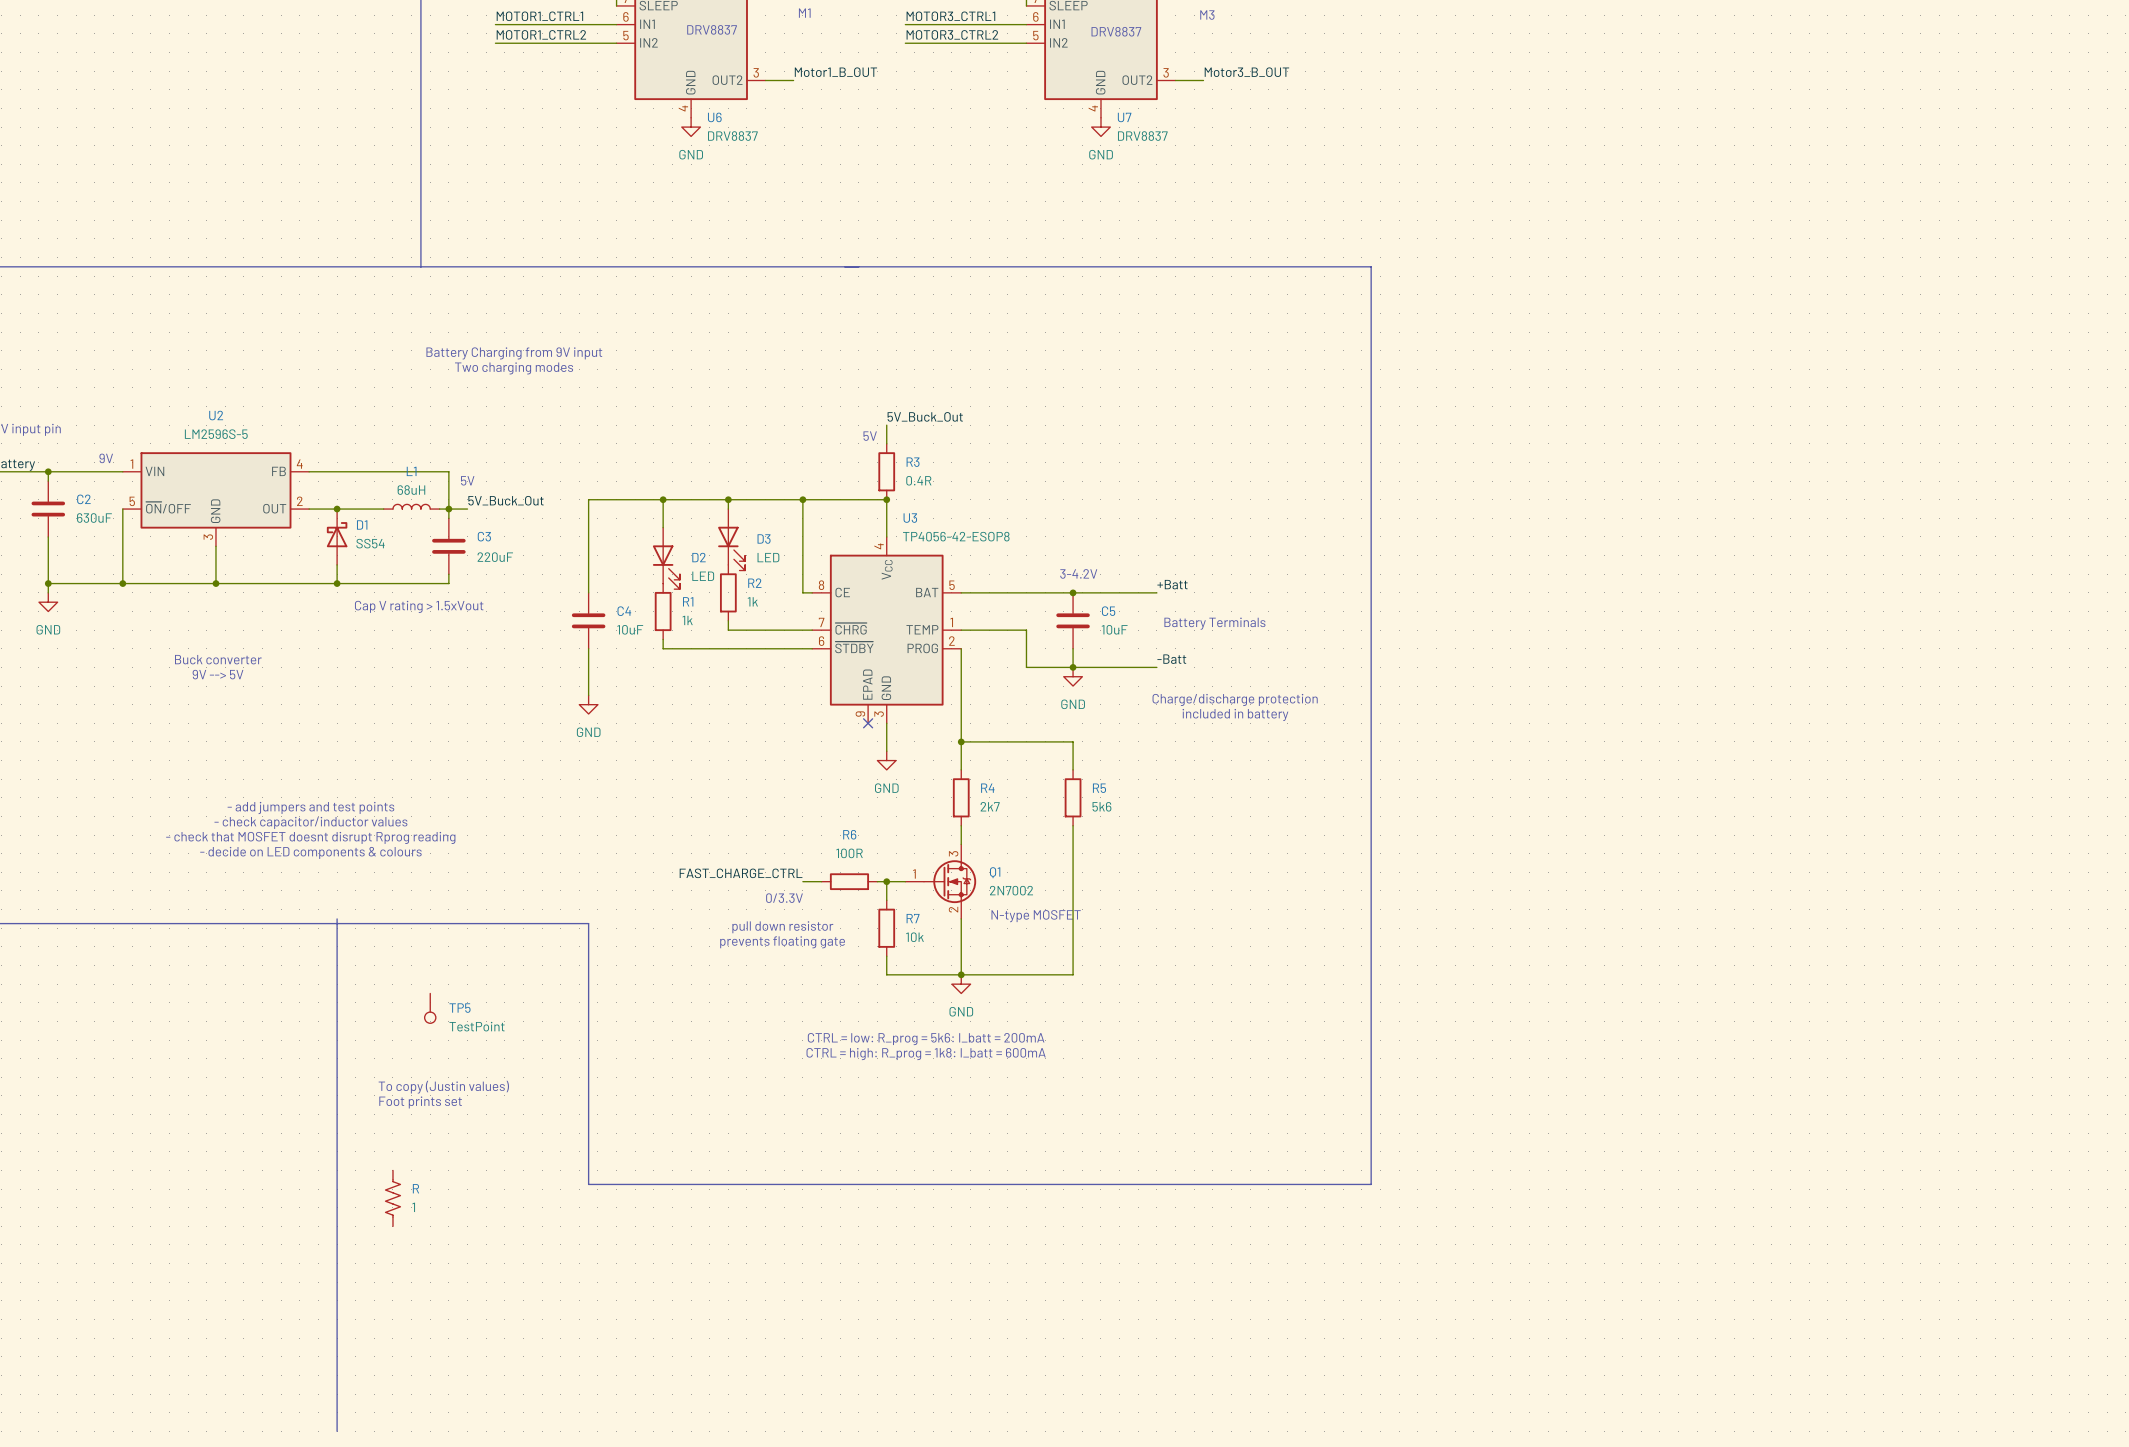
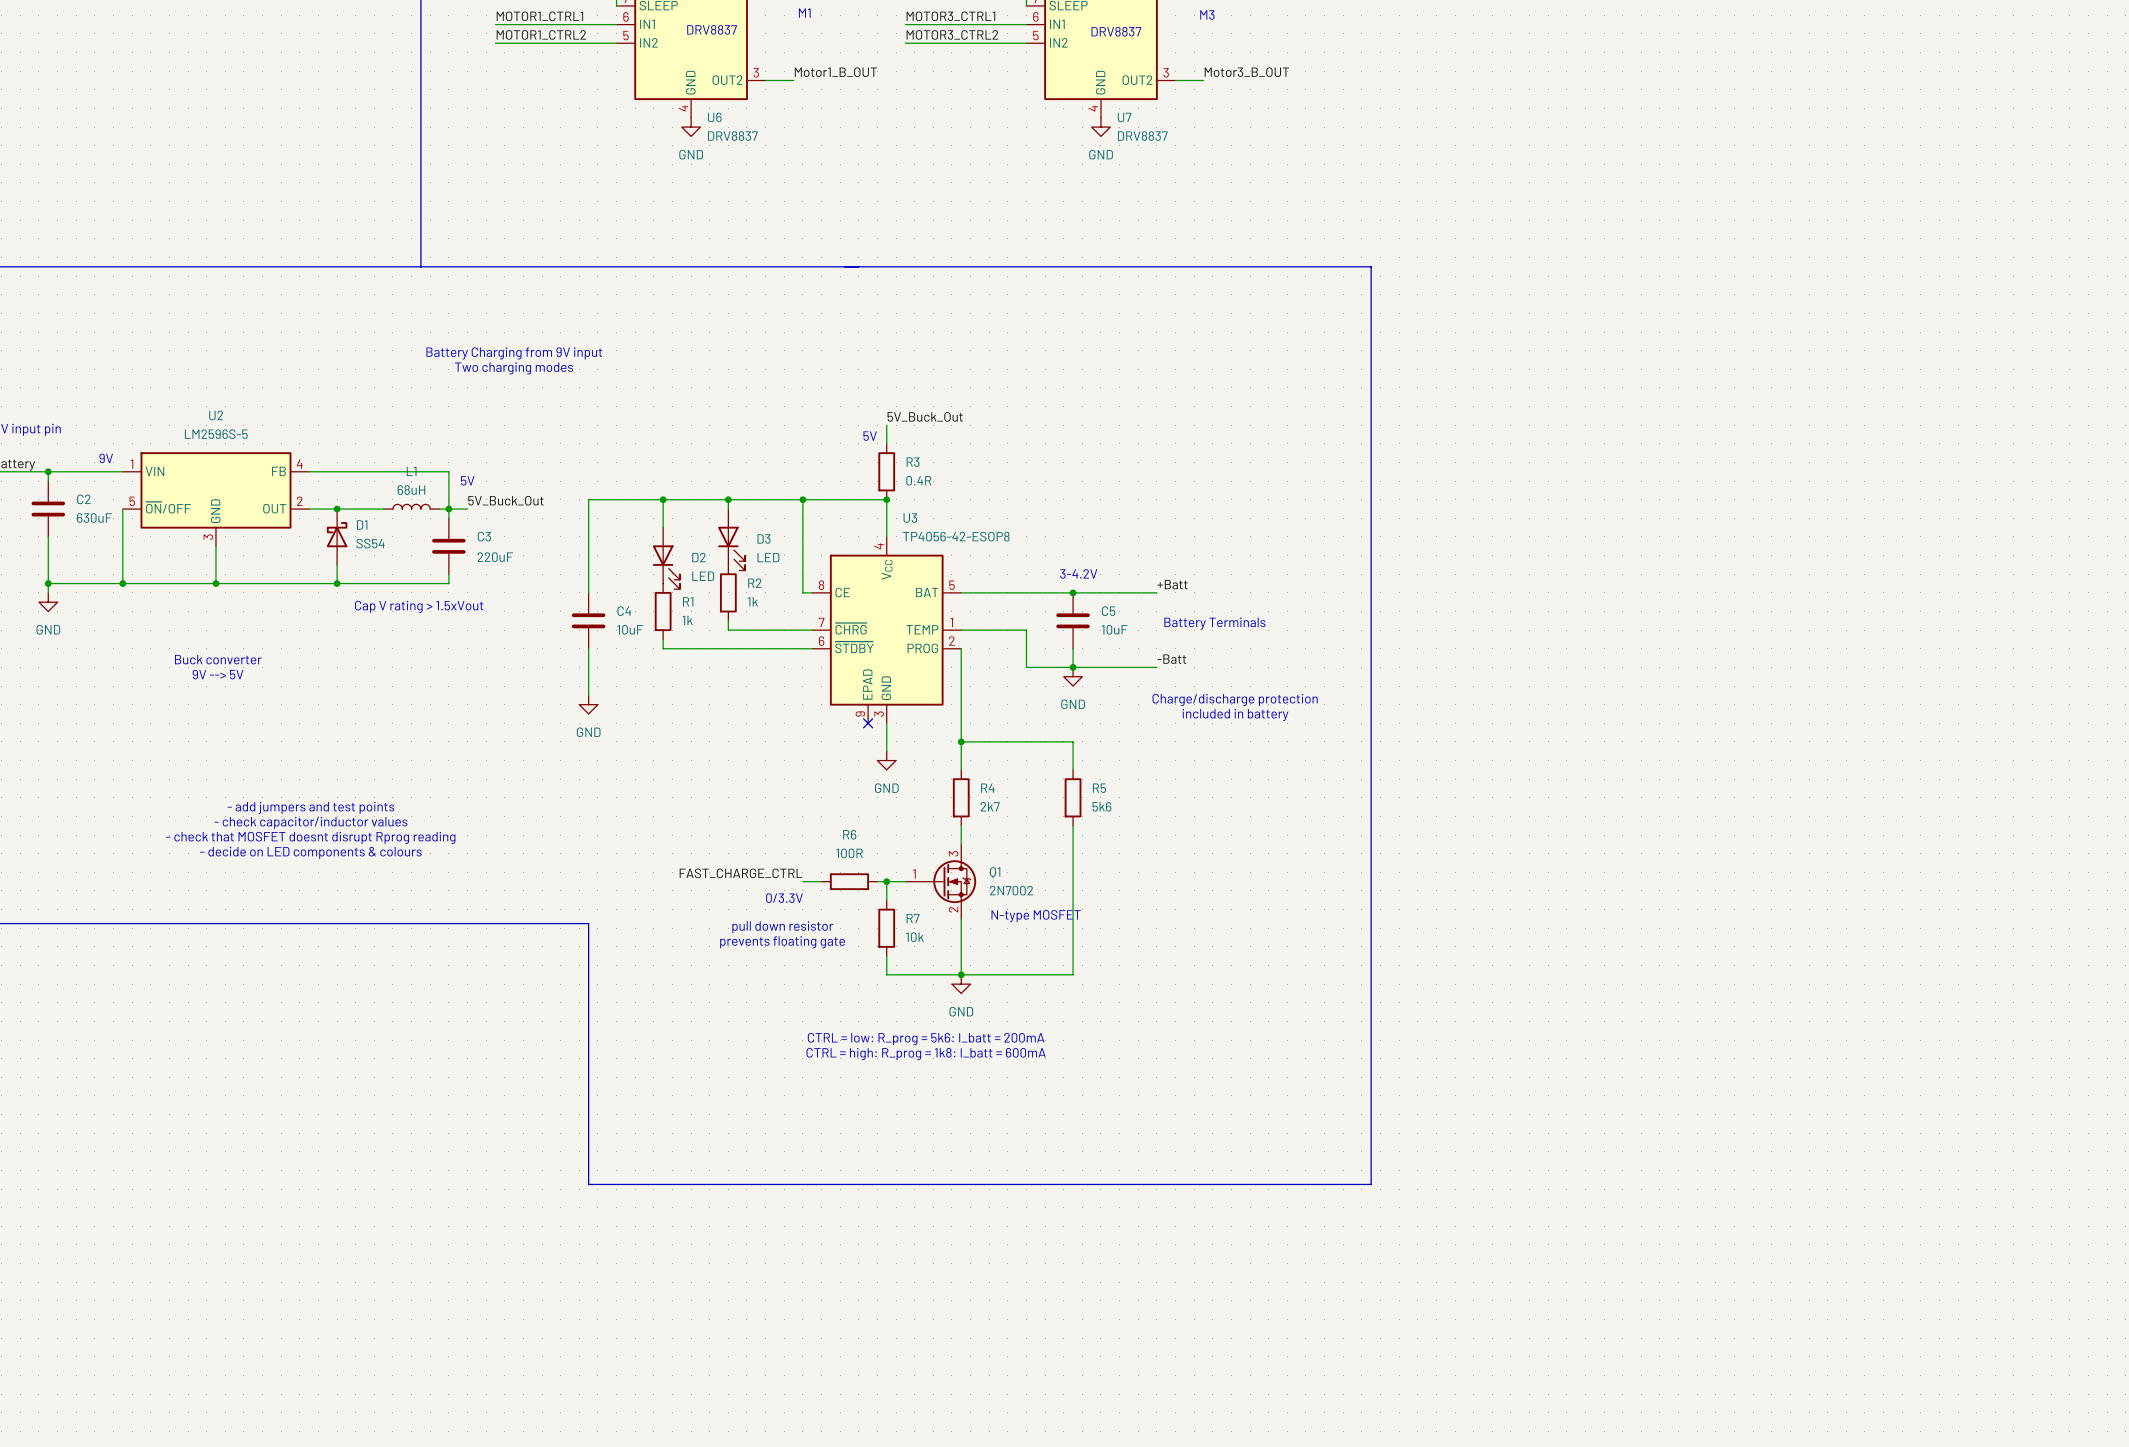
line: (337, 918) (337, 1431) -> none
TP5: TestPoint (430, 1008) -> none
text: To copy (Justin values) (443, 1087) -> none
text: Foot prints set (420, 1102) -> none
R: 1 (392, 1198) -> none

